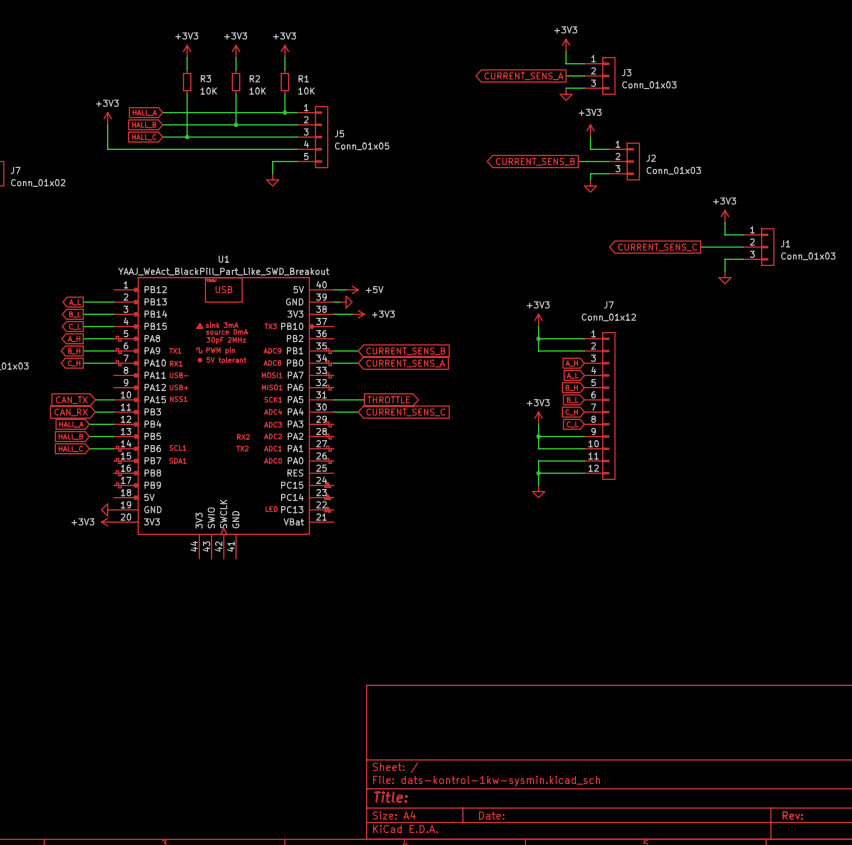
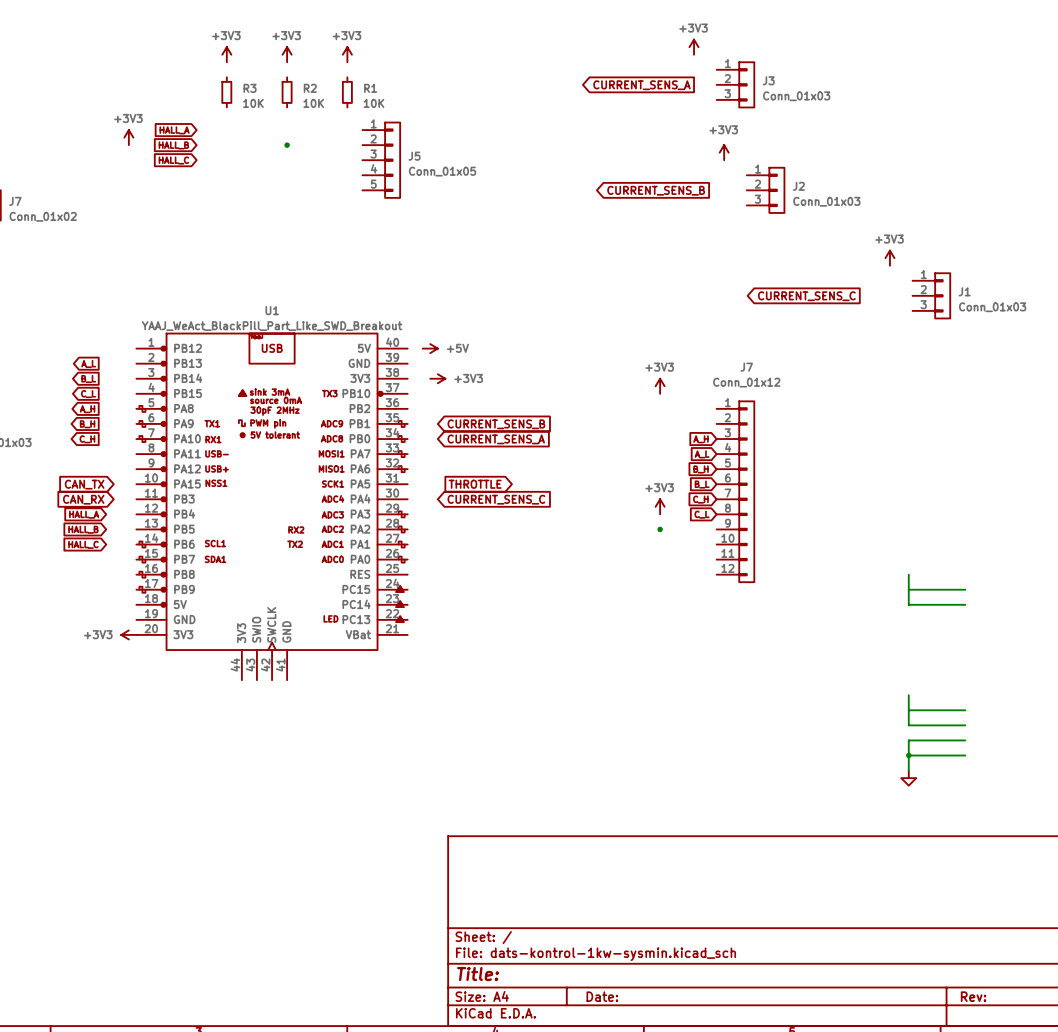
wire: (566, 51) (566, 63) (584, 63) -> none
wire: (187, 57) (187, 69) -> none
wire: (236, 57) (236, 69) -> none
wire: (284, 57) (284, 69) -> none
wire: (566, 75) (584, 75) -> none
wire: (566, 88) (584, 88) -> none
wire: (187, 94) (187, 137) -> none
wire: (236, 94) (236, 124) -> none
wire: (284, 94) (284, 112) -> none
power symbol: (566, 94) -> none
wire: (162, 112) (297, 112) -> none
junction: (284, 112) -> none
wire: (107, 124) (107, 149) (297, 149) -> none
wire: (162, 124) (297, 124) -> none
wire: (162, 137) (297, 137) -> none
junction: (187, 137) -> none
wire: (590, 137) (590, 149) (608, 149) -> none
wire: (297, 161) (272, 161) (272, 173) -> none
wire: (578, 161) (608, 161) -> none
wire: (608, 173) (590, 173) (590, 179) -> none
power symbol: (272, 179) -> none
power symbol: (590, 185) -> none
wire: (724, 222) (724, 234) (743, 234) -> none
wire: (700, 247) (743, 247) -> none
wire: (743, 259) (724, 259) (724, 271) -> none
power symbol: (724, 277) -> none
wire: (333, 289) (346, 289) -> none
wire: (83, 302) (113, 302) -> none
wire: (333, 302) (339, 302) -> none
power symbol: (346, 302) -> none
wire: (83, 314) (113, 314) -> none
wire: (333, 314) (352, 314) -> none
wire: (83, 326) (113, 326) -> none
wire: (538, 326) (538, 350) (584, 350) -> none
wire: (83, 338) (113, 338) -> none
wire: (538, 338) (584, 338) -> none
junction: (538, 338) -> none
wire: (83, 350) (113, 350) -> none
wire: (333, 350) (358, 350) -> none
wire: (83, 363) (113, 363) -> none
wire: (333, 363) (358, 363) -> none
wire: (95, 399) (113, 399) -> none
wire: (333, 399) (364, 399) -> none
wire: (95, 412) (113, 412) -> none
wire: (333, 412) (358, 412) -> none
wire: (89, 424) (113, 424) -> none
wire: (538, 424) (538, 448) (584, 448) -> none
wire: (89, 436) (113, 436) -> none
wire: (538, 436) (584, 436) -> none
wire: (89, 448) (113, 448) -> none
wire: (584, 461) (538, 461) (538, 485) -> none
wire: (538, 473) (584, 473) -> none
junction: (538, 473) -> none
wire: none -> (908, 574) (908, 604) (965, 604)
wire: none -> (908, 589) (965, 589)
power symbol: (538, 491) -> none
power symbol: (107, 509) -> none
wire: none -> (908, 695) (908, 725) (965, 725)
wire: none -> (908, 710) (965, 710)
wire: none -> (965, 740) (908, 740) (908, 770)
wire: none -> (908, 755) (965, 755)
junction: none -> (908, 755)
power symbol: none -> (908, 778)

